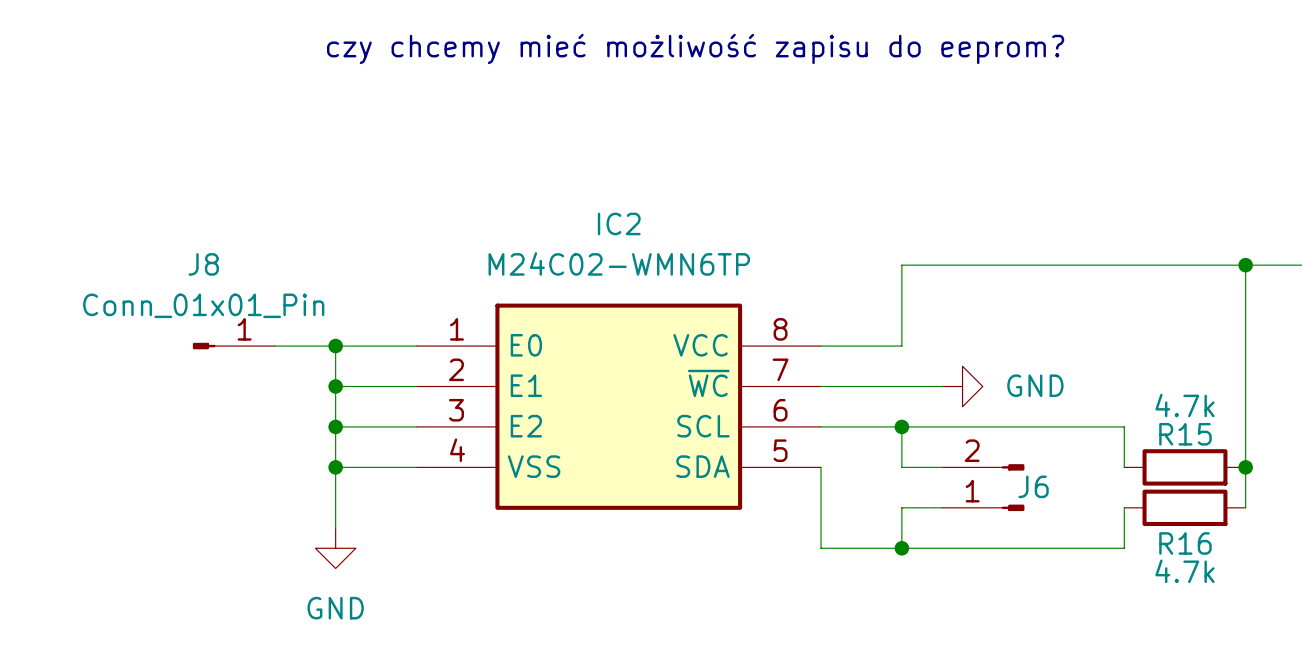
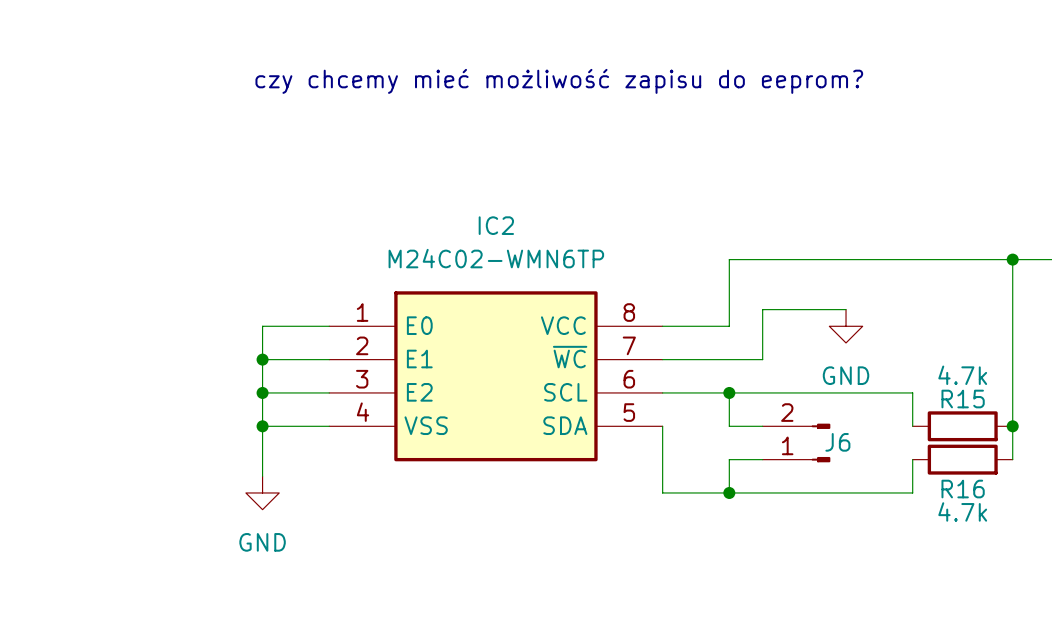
wire: none -> (846, 309) (762, 309) (762, 359)
J8: Conn_01x01_Pin (233, 346) -> none
wire: (274, 346) (335, 346) -> none
junction: (335, 346) -> none
power symbol rotation: 0° (962, 386) -> 90° clockwise (846, 326)
power symbol position: GND (962, 386) -> GND (846, 326)

